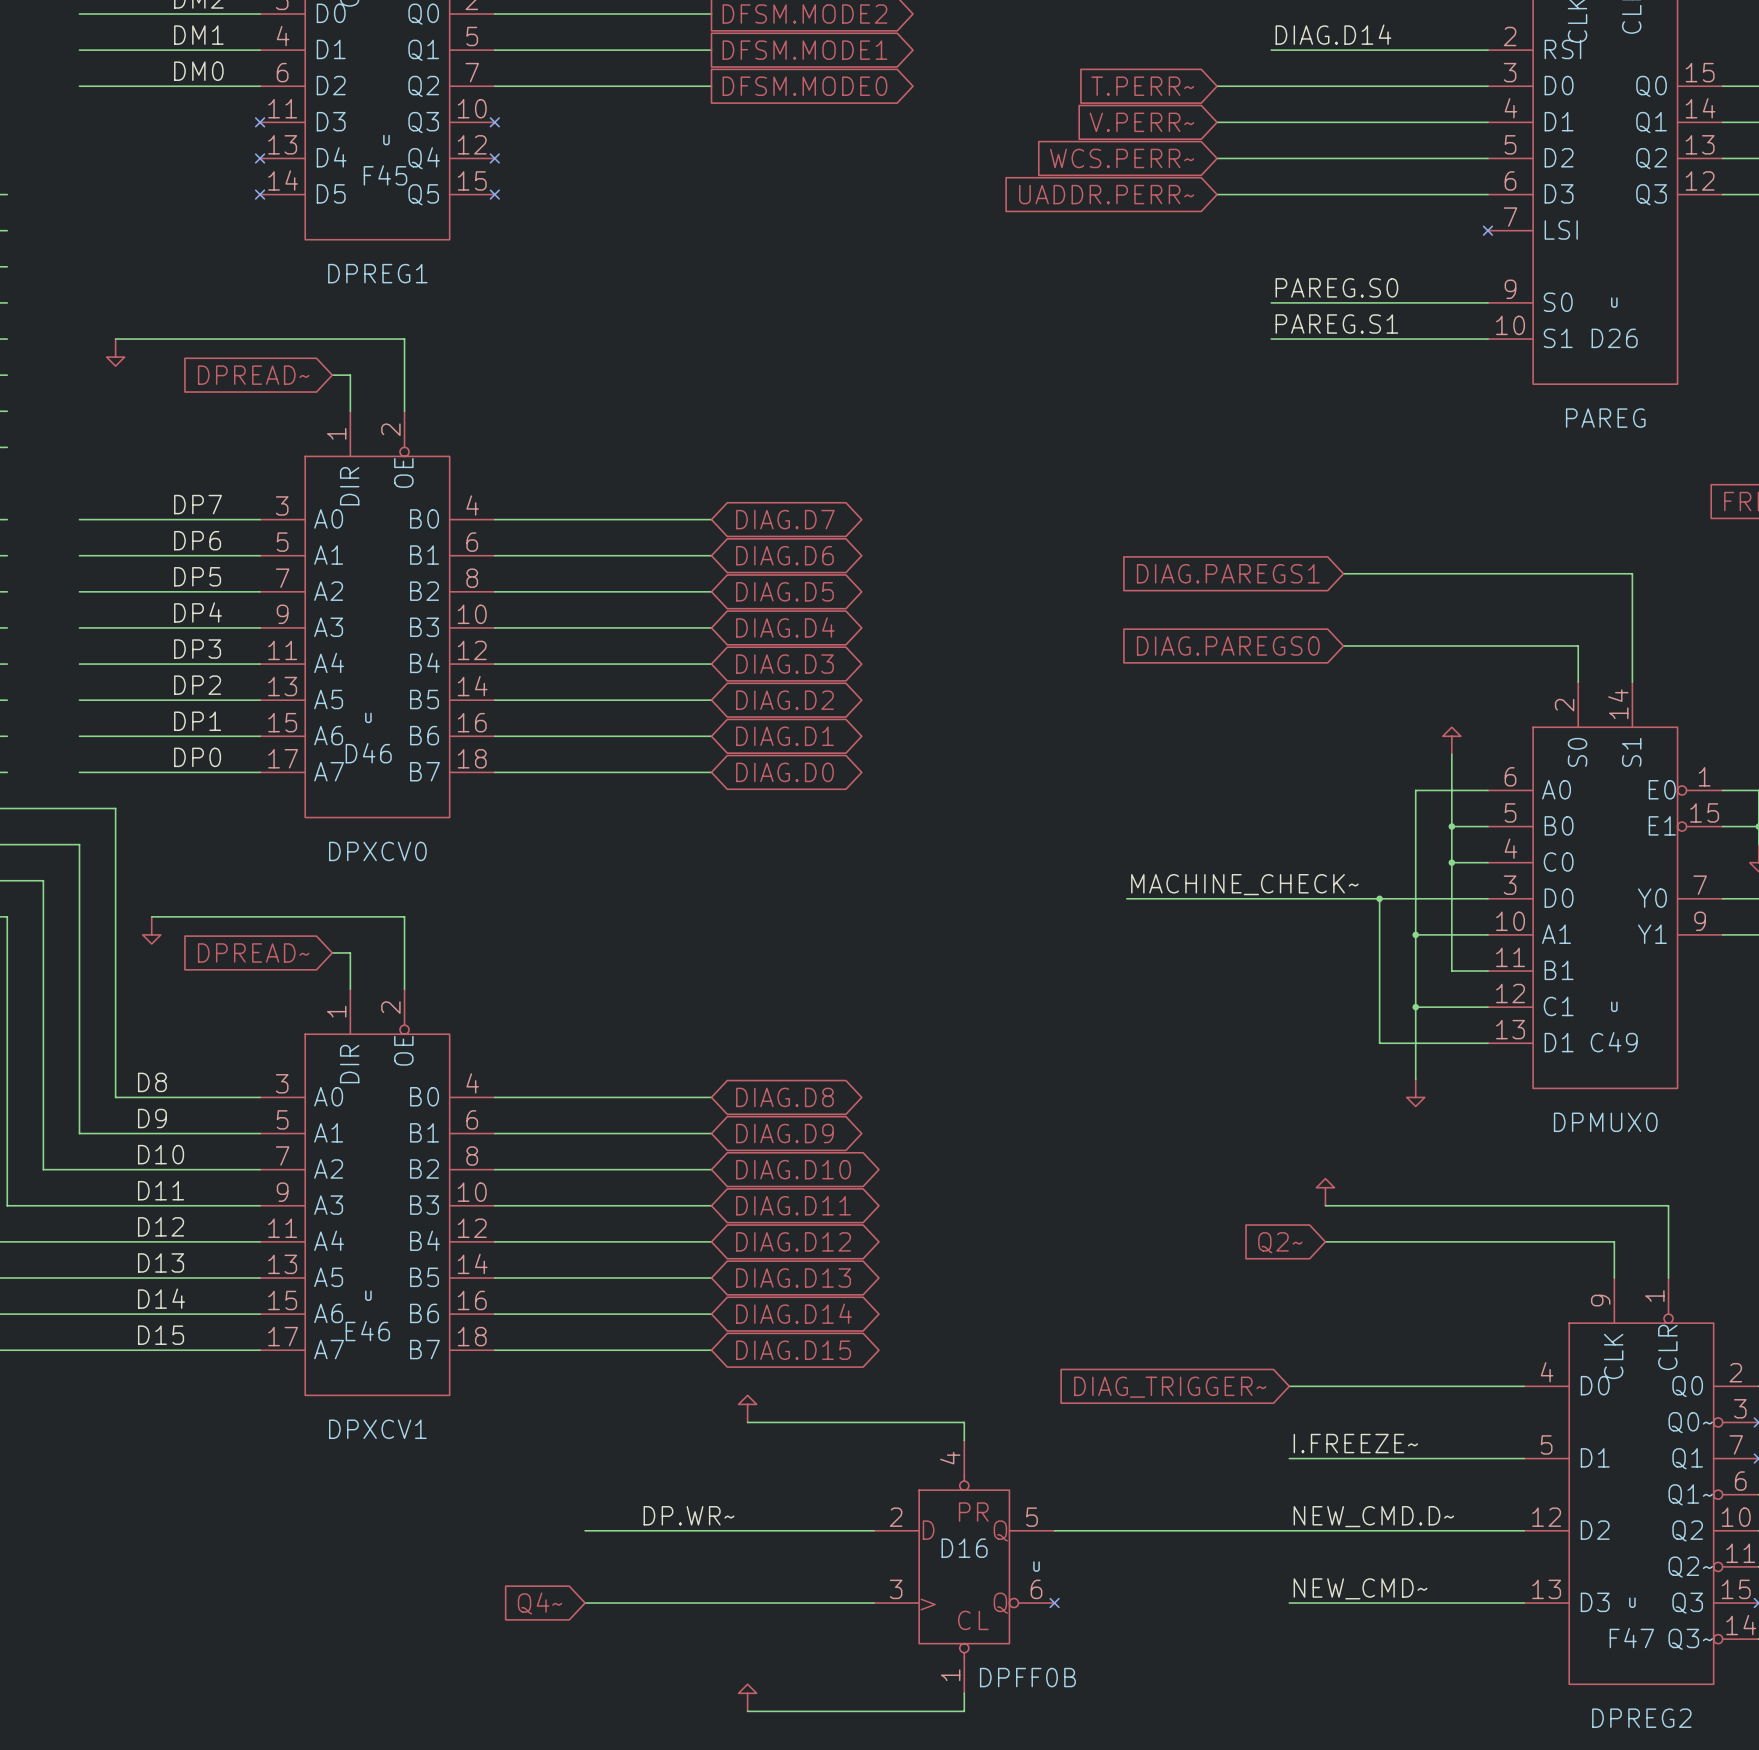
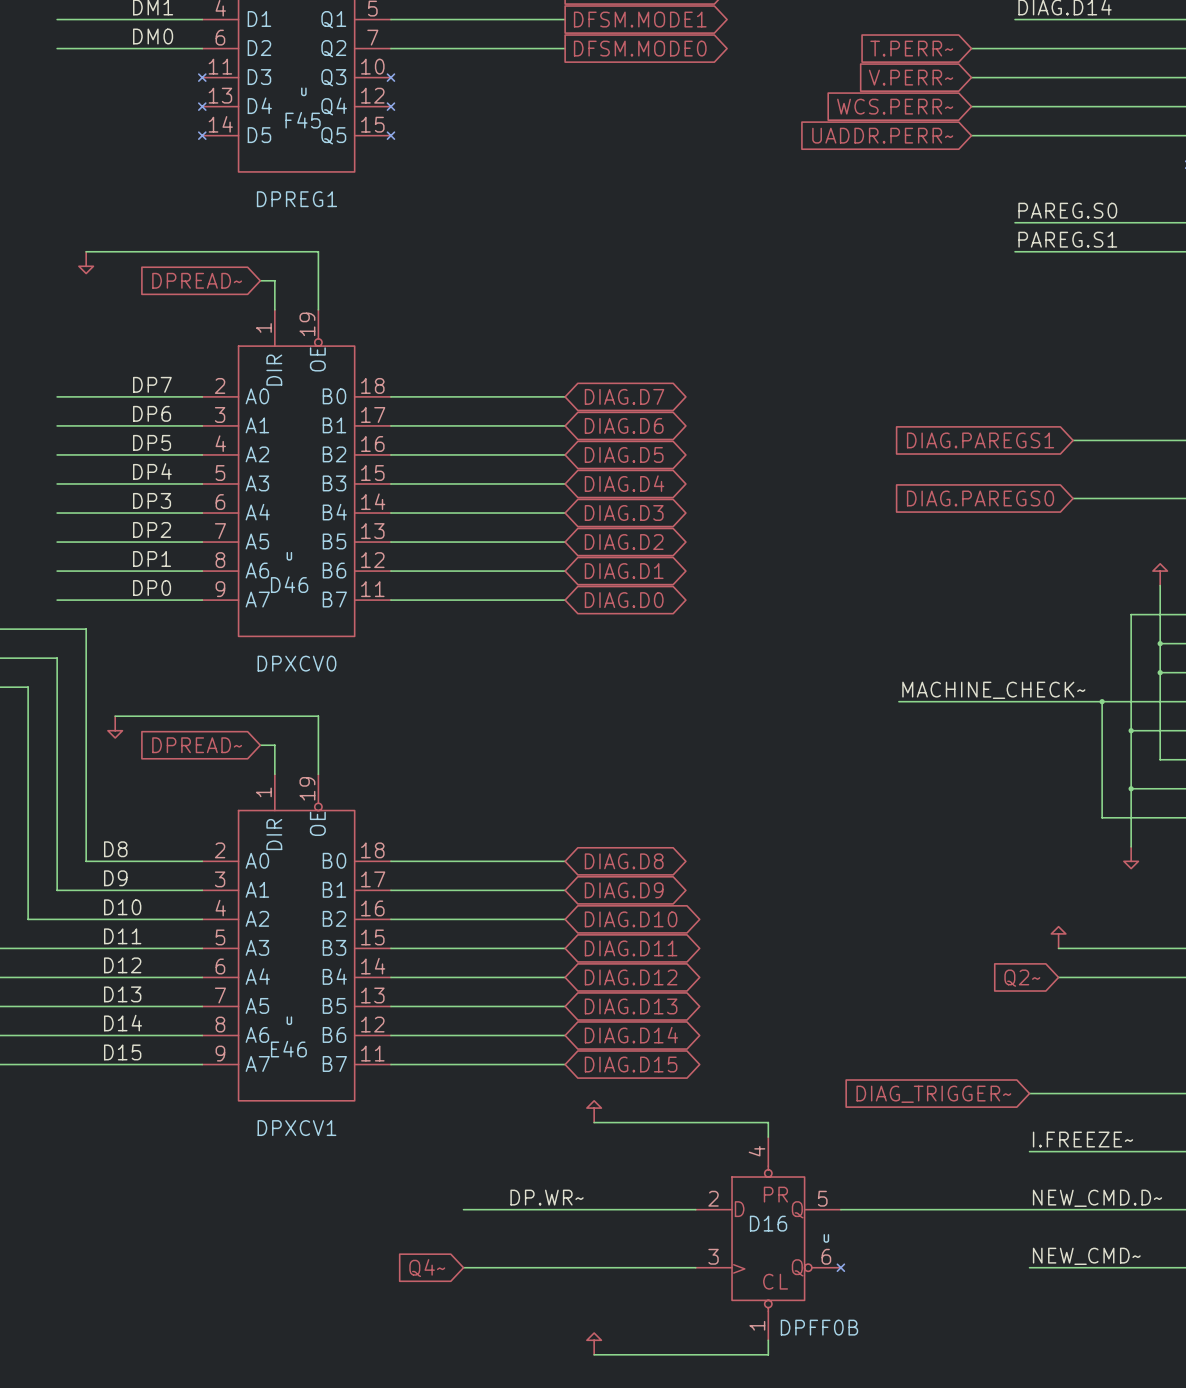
U symbol: [260, 411, 495, 818] -> [202, 309, 391, 637]
U symbol: [260, 989, 495, 1396] -> [202, 774, 391, 1101]

